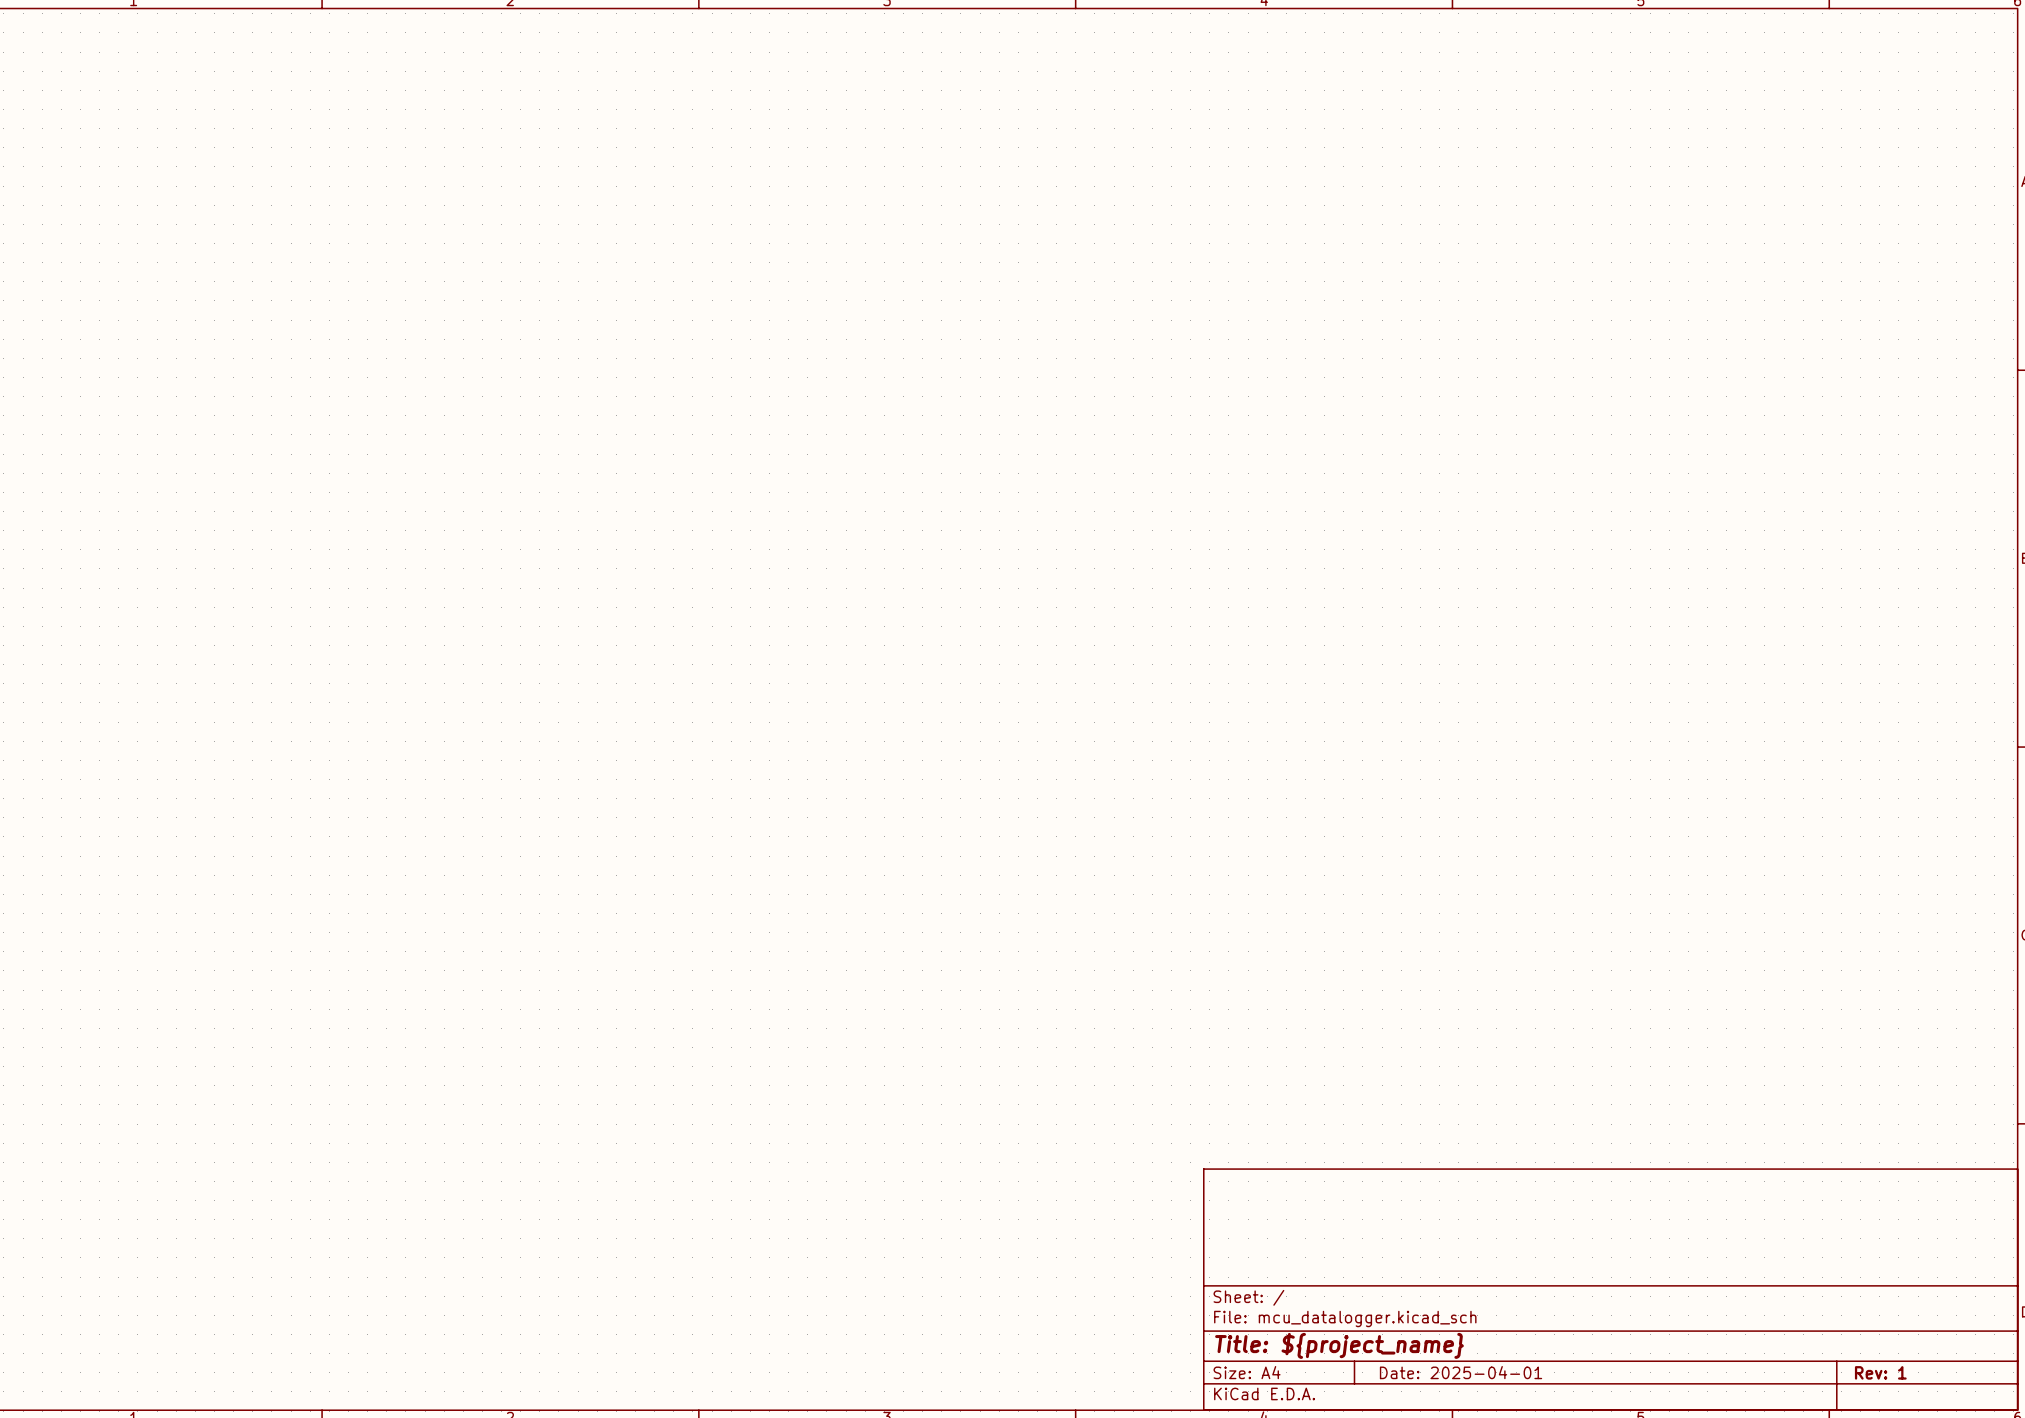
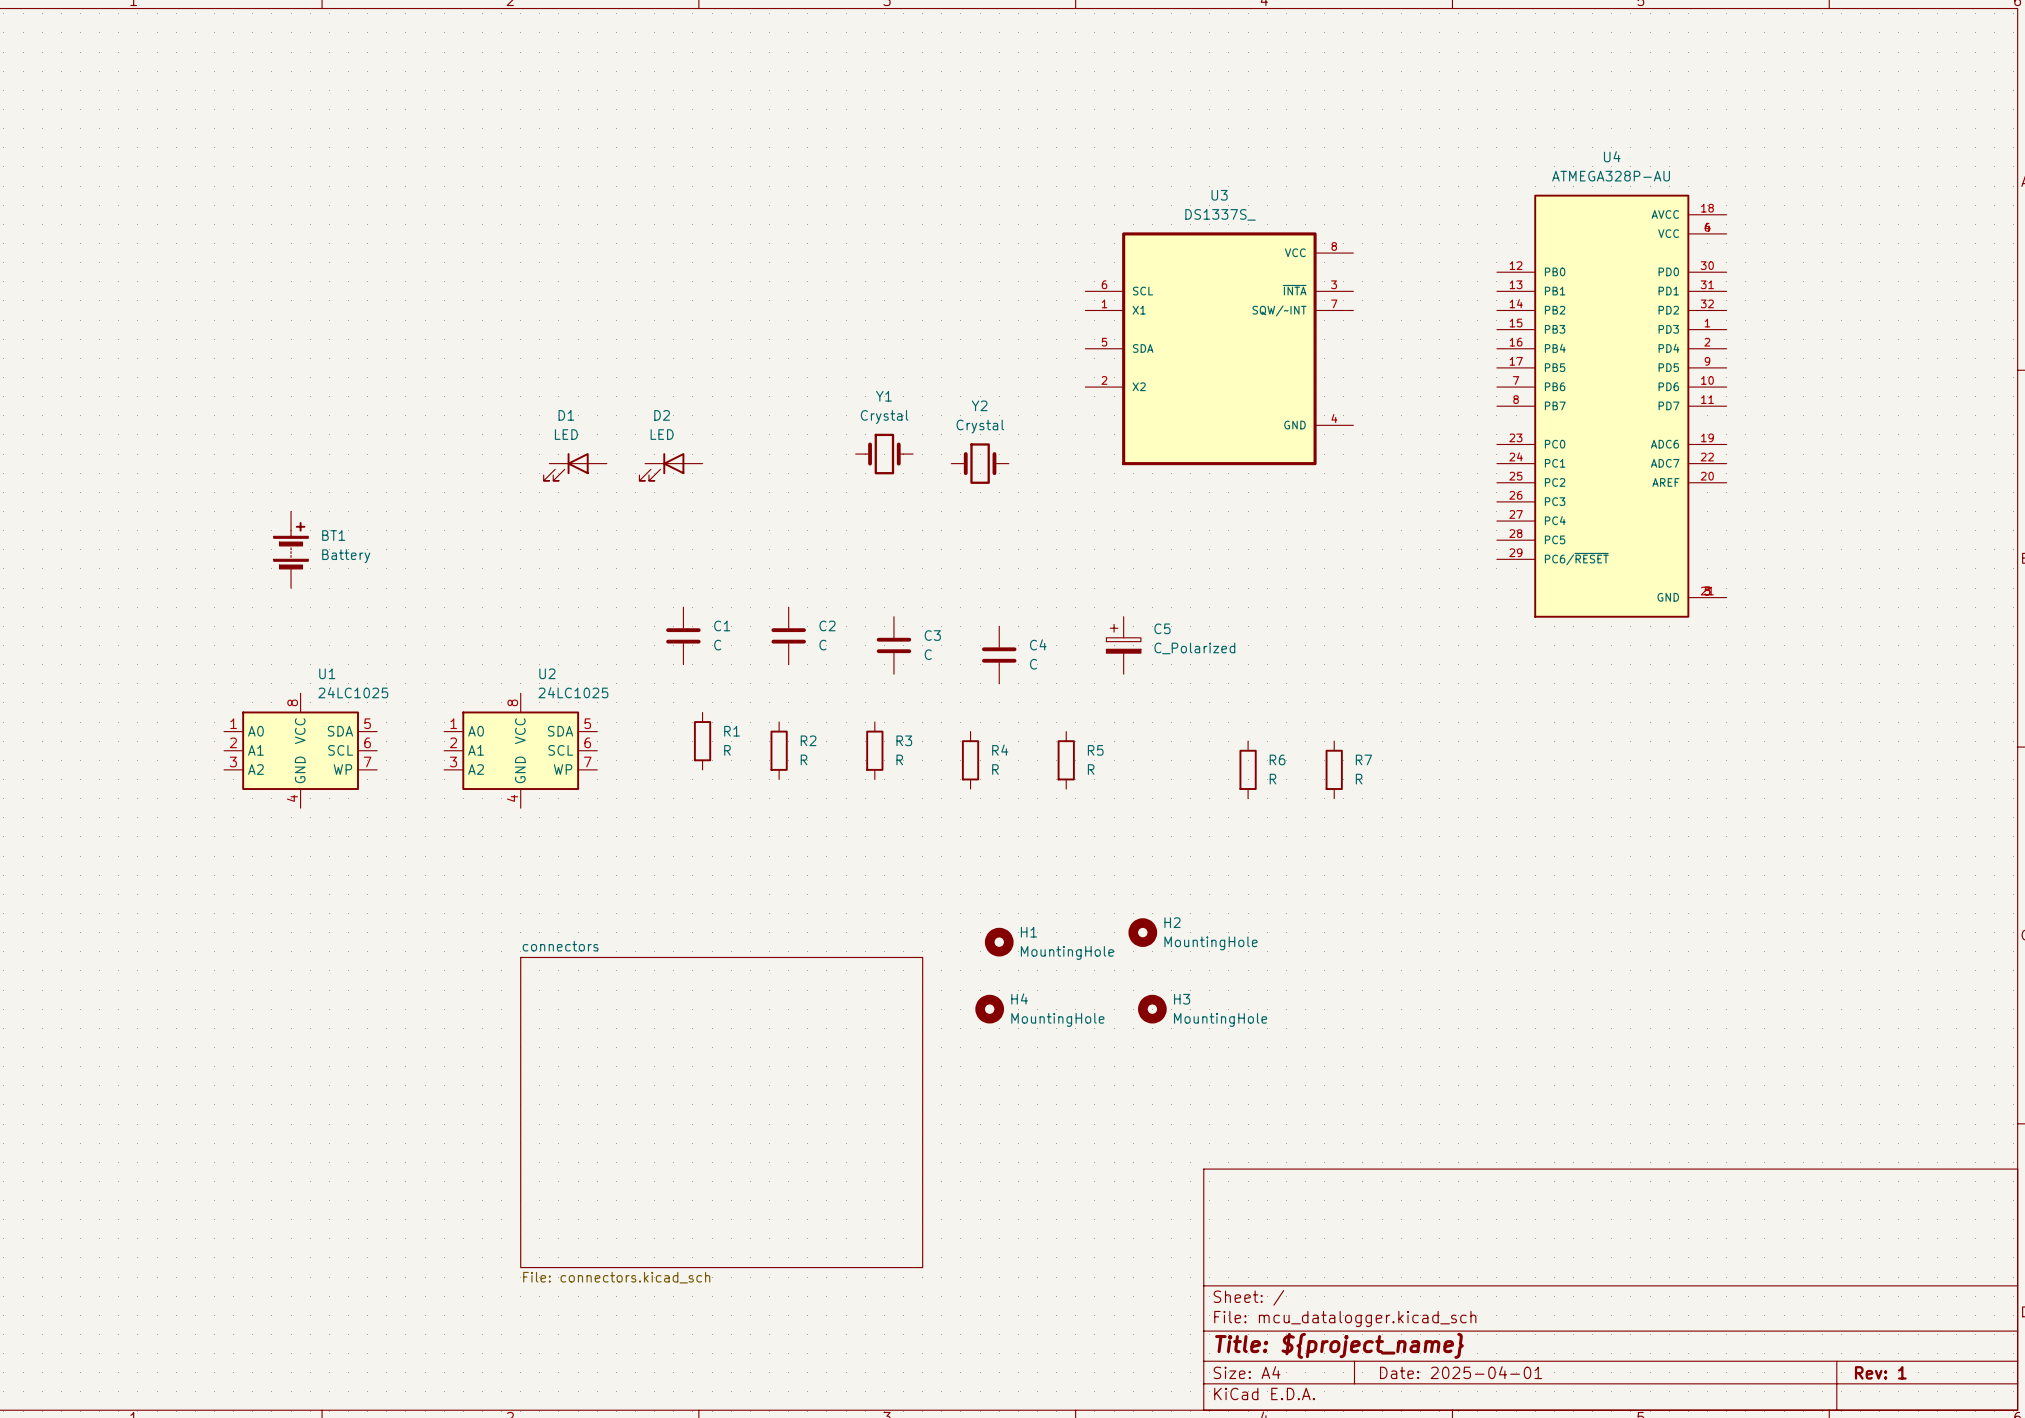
U3: none -> DS1337S_ (1219, 348)
U4: none -> ATMEGA328P-AU (1611, 406)
Y1: none -> Crystal (884, 454)
Y2: none -> Crystal (980, 463)
D1: none -> LED (575, 466)
D2: none -> LED (670, 466)
BT1: none -> Battery (291, 549)
C1: none -> C (683, 635)
C2: none -> C (788, 635)
C3: none -> C (893, 645)
C5: none -> C_Polarized (1123, 645)
C4: none -> C (999, 655)
R1: none -> R (702, 741)
U1: none -> 24LC1025 (300, 750)
U2: none -> 24LC1025 (520, 750)
R2: none -> R (779, 750)
R3: none -> R (874, 750)
R4: none -> R (970, 760)
R5: none -> R (1066, 760)
R6: none -> R (1248, 769)
R7: none -> R (1334, 769)
H2: none -> MountingHole (1142, 932)
H1: none -> MountingHole (999, 942)
H4: none -> MountingHole (989, 1009)
H3: none -> MountingHole (1152, 1009)
sheet connectors: none -> File: connectors.kicad_sch (721, 1112)

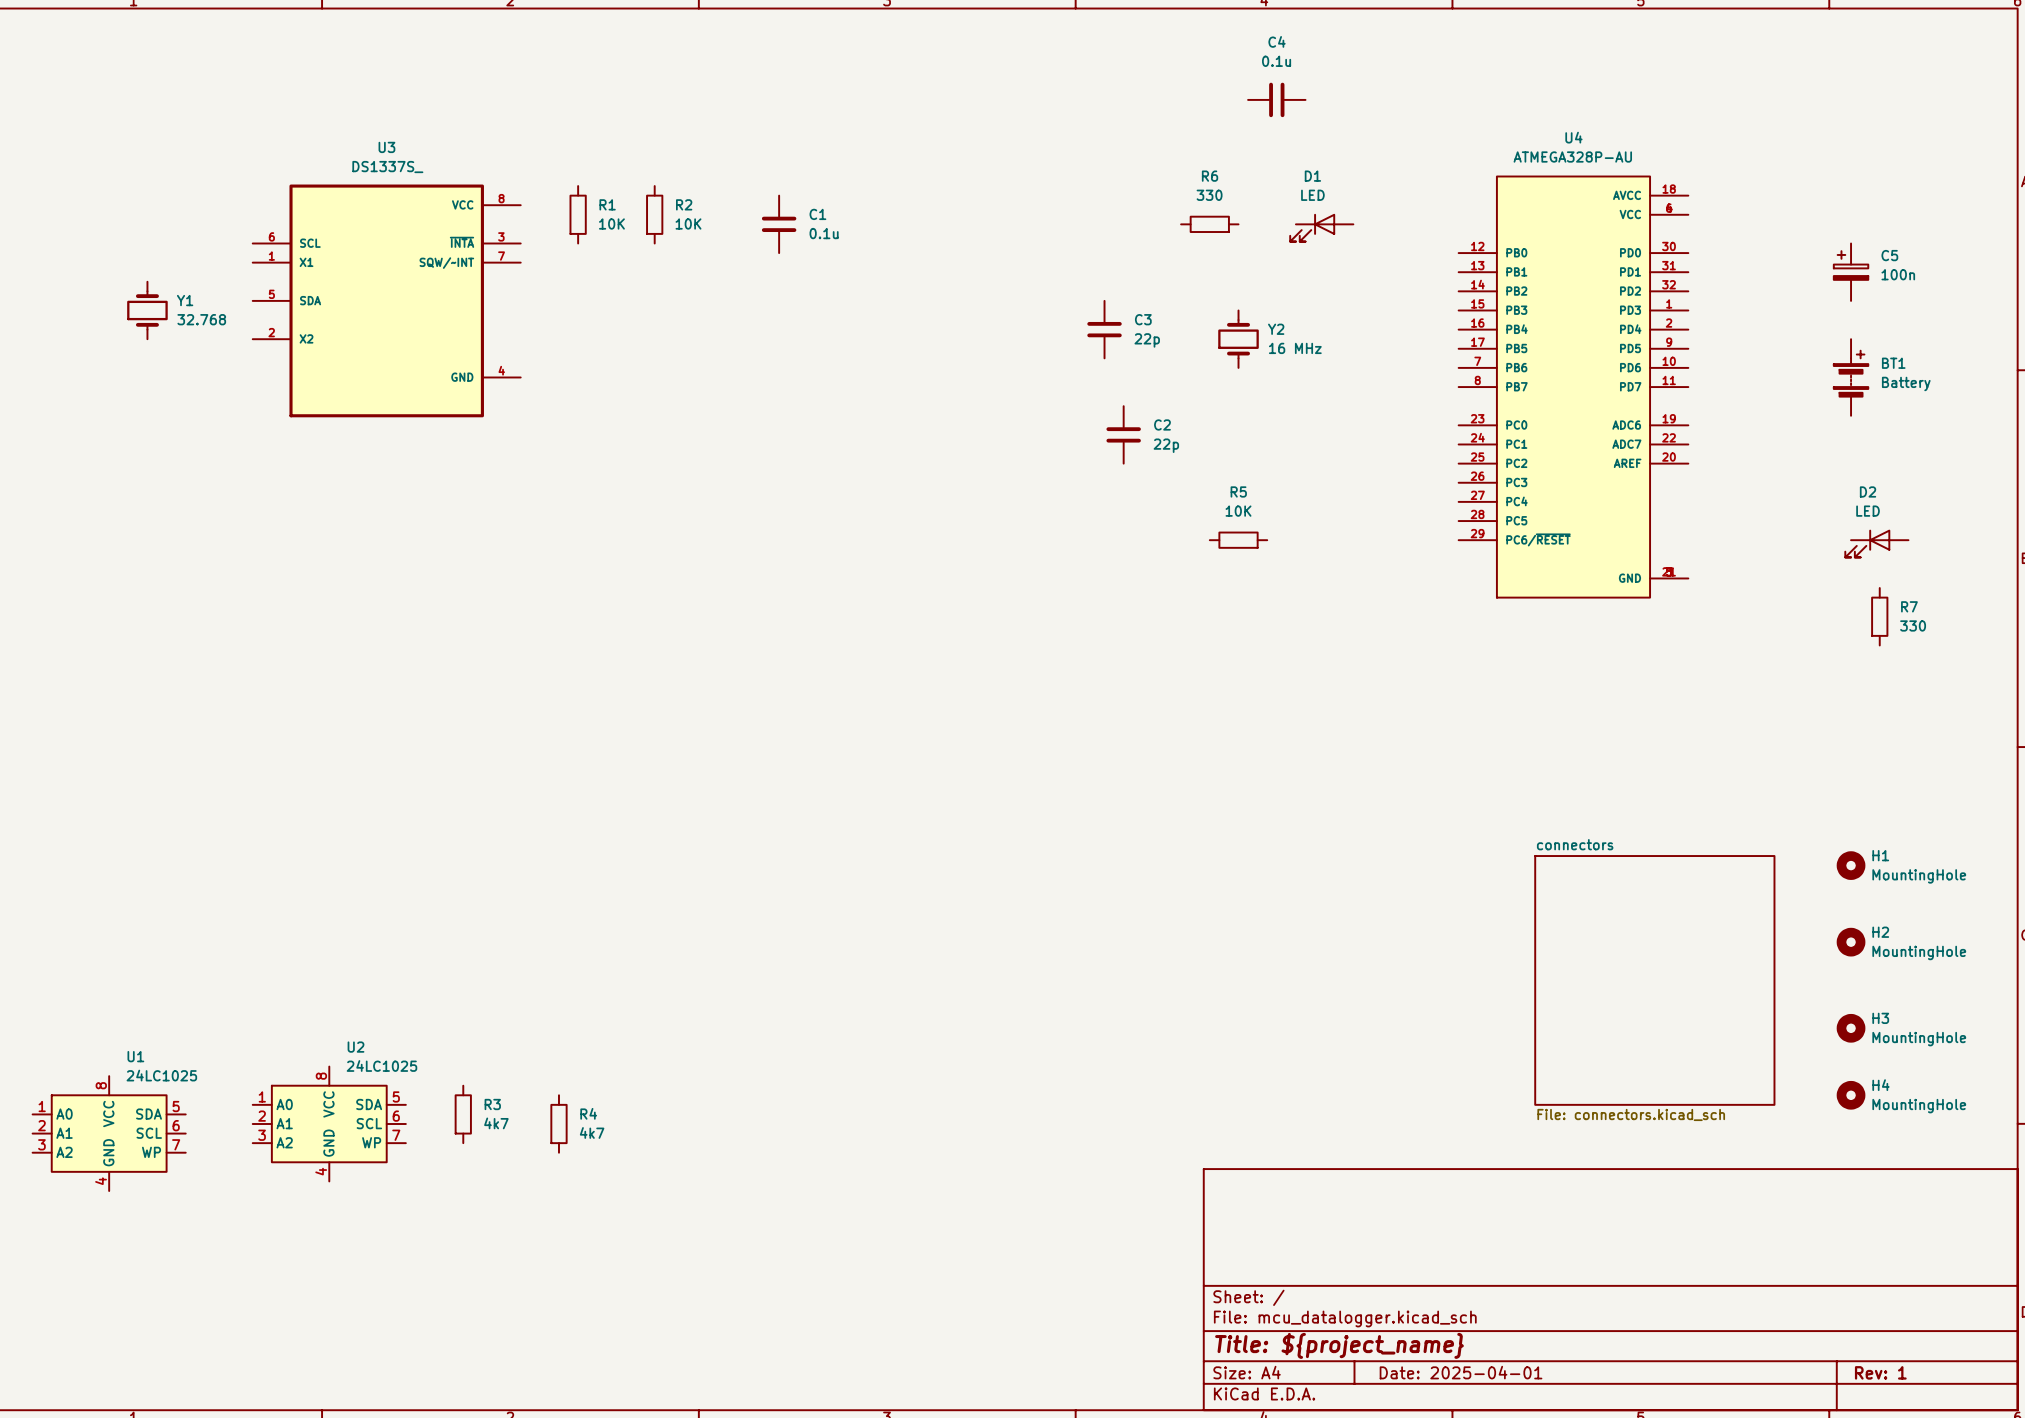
U3 position: (1219, 348) -> (386, 300)
Y1 name position: Y1 (883, 396) -> Y1 (185, 300)
Y2 name position: Y2 (979, 405) -> Y2 (1276, 329)
U4 position: (1611, 406) -> (1573, 387)
Y1 value: Crystal (884, 417) -> 32.768 (201, 319)
Y2 value: Crystal (980, 426) -> 16 MHz (1295, 348)
Y1 rotation: 0° (884, 454) -> 90° clockwise (147, 310)
Y1 position: (884, 454) -> (147, 310)
Y2 rotation: 0° (980, 463) -> 90° clockwise (1238, 339)
Y2 position: (980, 463) -> (1238, 339)
D1 position: (575, 466) -> (1321, 227)
D2 position: (670, 466) -> (1876, 543)
BT1 position: (291, 549) -> (1851, 377)
C1 position: (683, 635) -> (779, 224)
C2 position: (788, 635) -> (1123, 434)
C4 name position: C4 (1038, 644) -> C4 (1277, 41)
C1 value: C (717, 645) -> 0.1u (824, 233)
C2 value: C (822, 645) -> 22p (1166, 445)
C3 position: (893, 645) -> (1104, 329)
C5 position: (1123, 645) -> (1851, 272)
C5 value: C_Polarized (1194, 648) -> 100n (1898, 274)
C3 value: C (928, 654) -> 22p (1147, 340)
C4 rotation: 0° (999, 655) -> 90° clockwise (1276, 99)
C4 position: (999, 655) -> (1276, 99)
C4 value: C (1033, 664) -> 0.1u (1276, 61)
R1 position: (702, 741) -> (578, 214)
U1 position: (300, 750) -> (109, 1133)
U2 position: (520, 750) -> (329, 1124)
R1 value: R (727, 750) -> 10K (611, 223)
R2 position: (779, 750) -> (654, 214)
R3 position: (874, 750) -> (463, 1114)
R5 name position: R5 (1095, 750) -> R5 (1238, 491)
R2 value: R (804, 759) -> 10K (688, 223)
R3 value: R (899, 759) -> 4k7 (496, 1123)
R6 name position: R6 (1277, 759) -> R6 (1210, 176)
R4 position: (970, 760) -> (558, 1124)
R5 rotation: 0° (1066, 760) -> 90° clockwise (1238, 540)
R5 position: (1066, 760) -> (1238, 540)
R4 value: R (995, 769) -> 4k7 (592, 1132)
R5 value: R (1091, 769) -> 10K (1238, 511)
R6 rotation: 0° (1248, 769) -> 90° clockwise (1209, 224)
R6 position: (1248, 769) -> (1209, 224)
R7 position: (1334, 769) -> (1879, 616)
R6 value: R (1272, 779) -> 330 (1209, 195)
R7 value: R (1359, 779) -> 330 (1913, 625)
H2 position: (1142, 932) -> (1851, 942)
H1 position: (999, 942) -> (1851, 865)
sheet connectors: none -> File: connectors.kicad_sch (1654, 980)
H4 position: (989, 1009) -> (1851, 1095)
H3 position: (1152, 1009) -> (1851, 1028)
sheet connectors: File: connectors.kicad_sch (721, 1112) -> none

